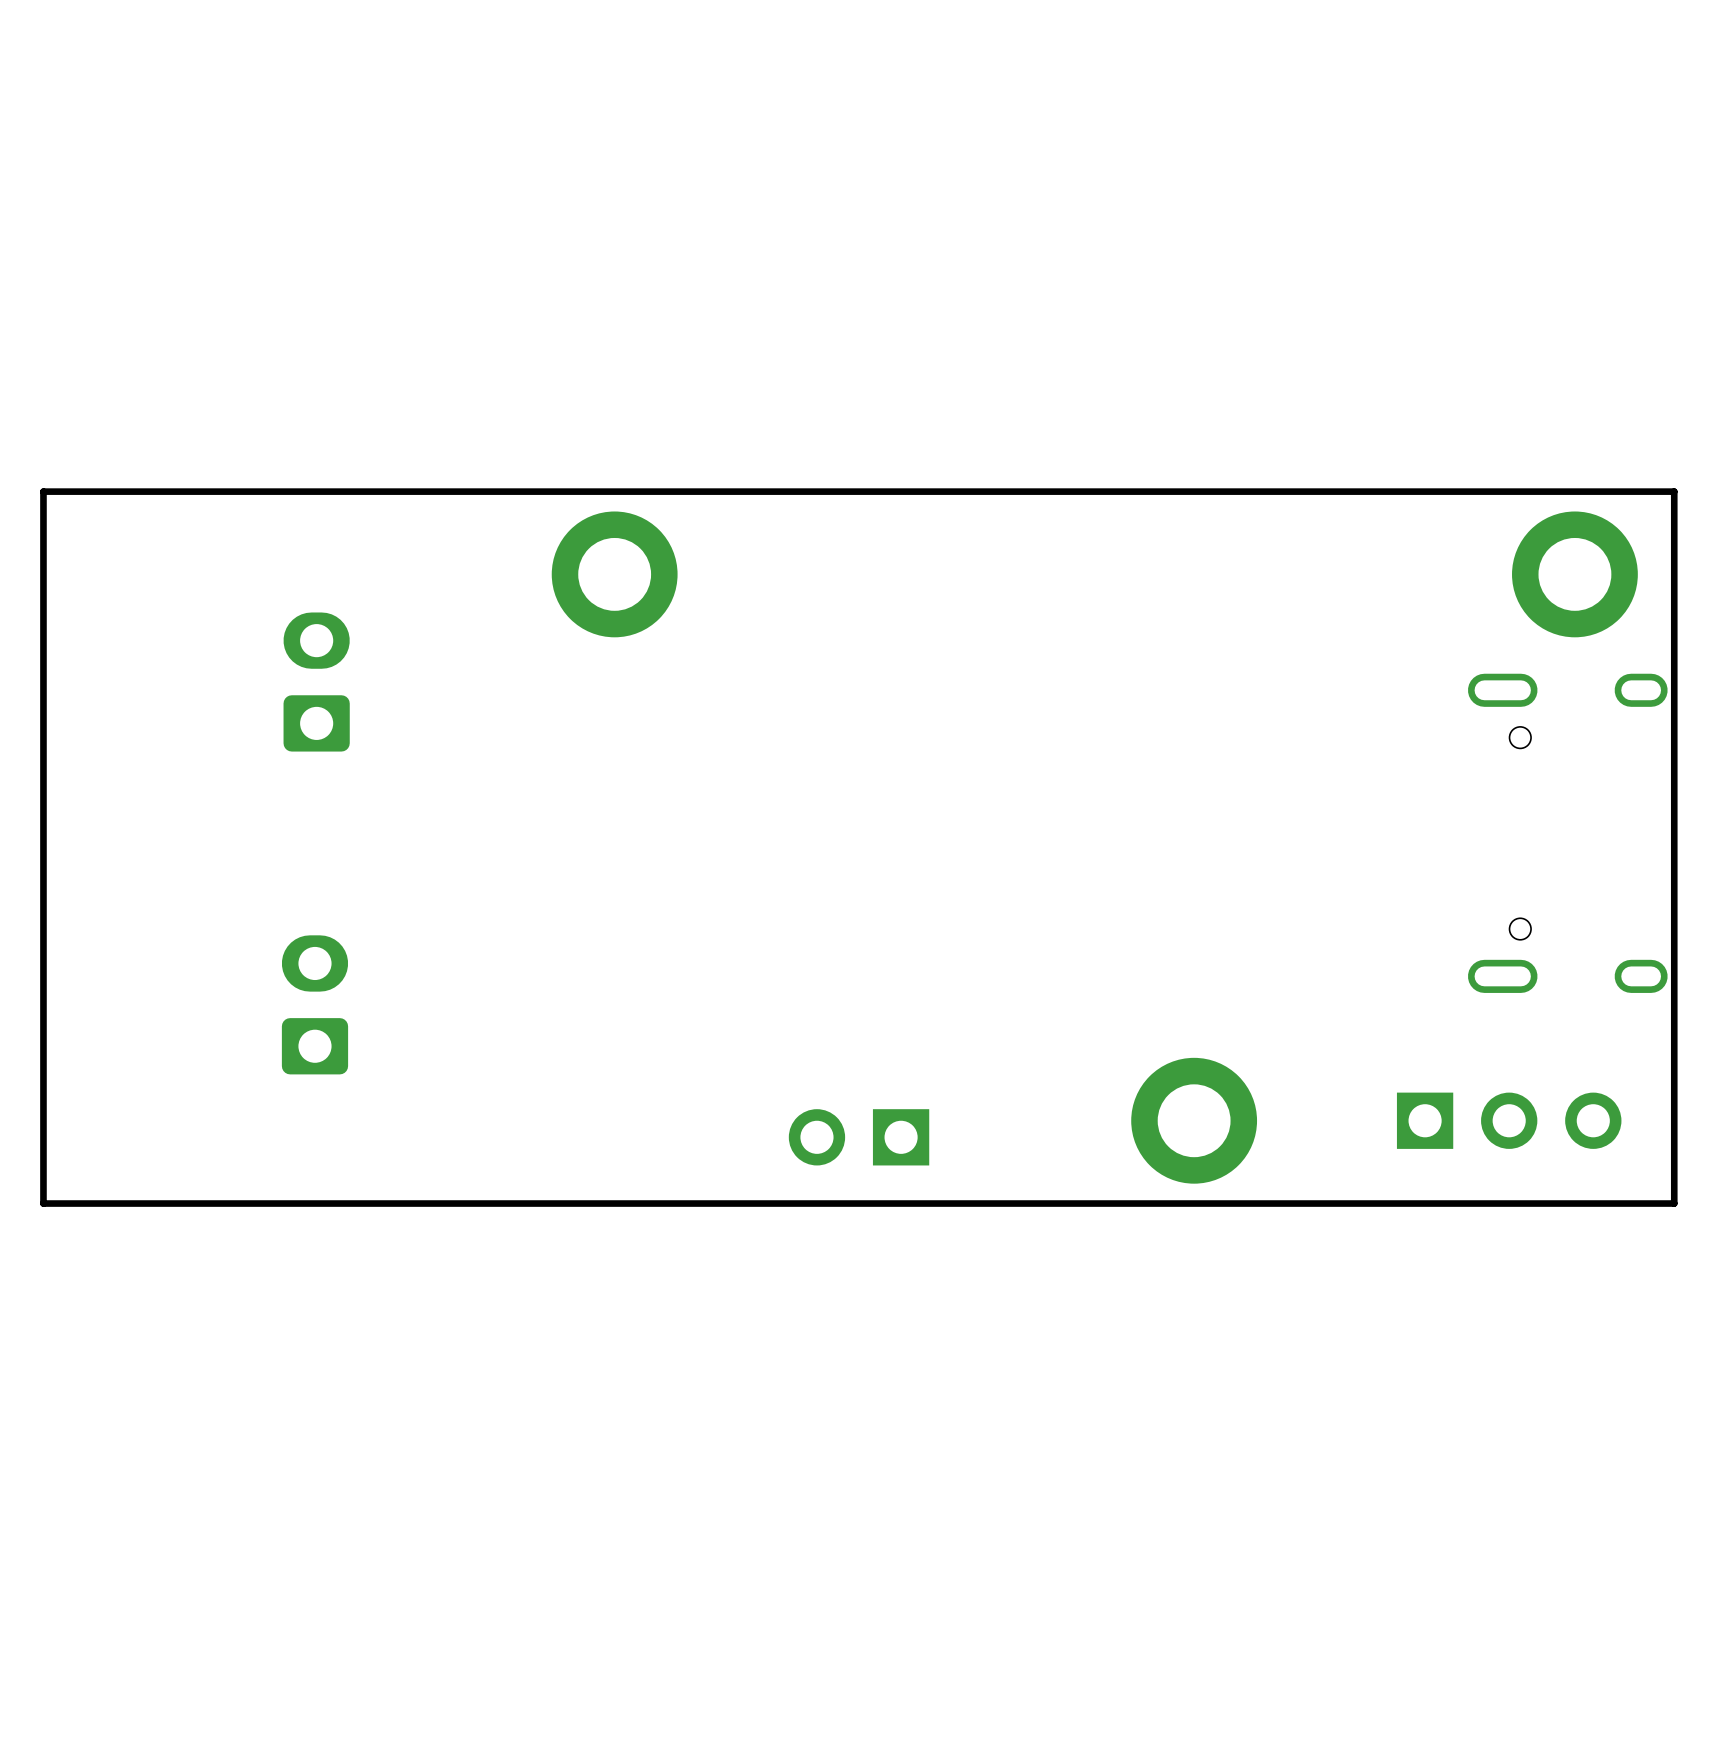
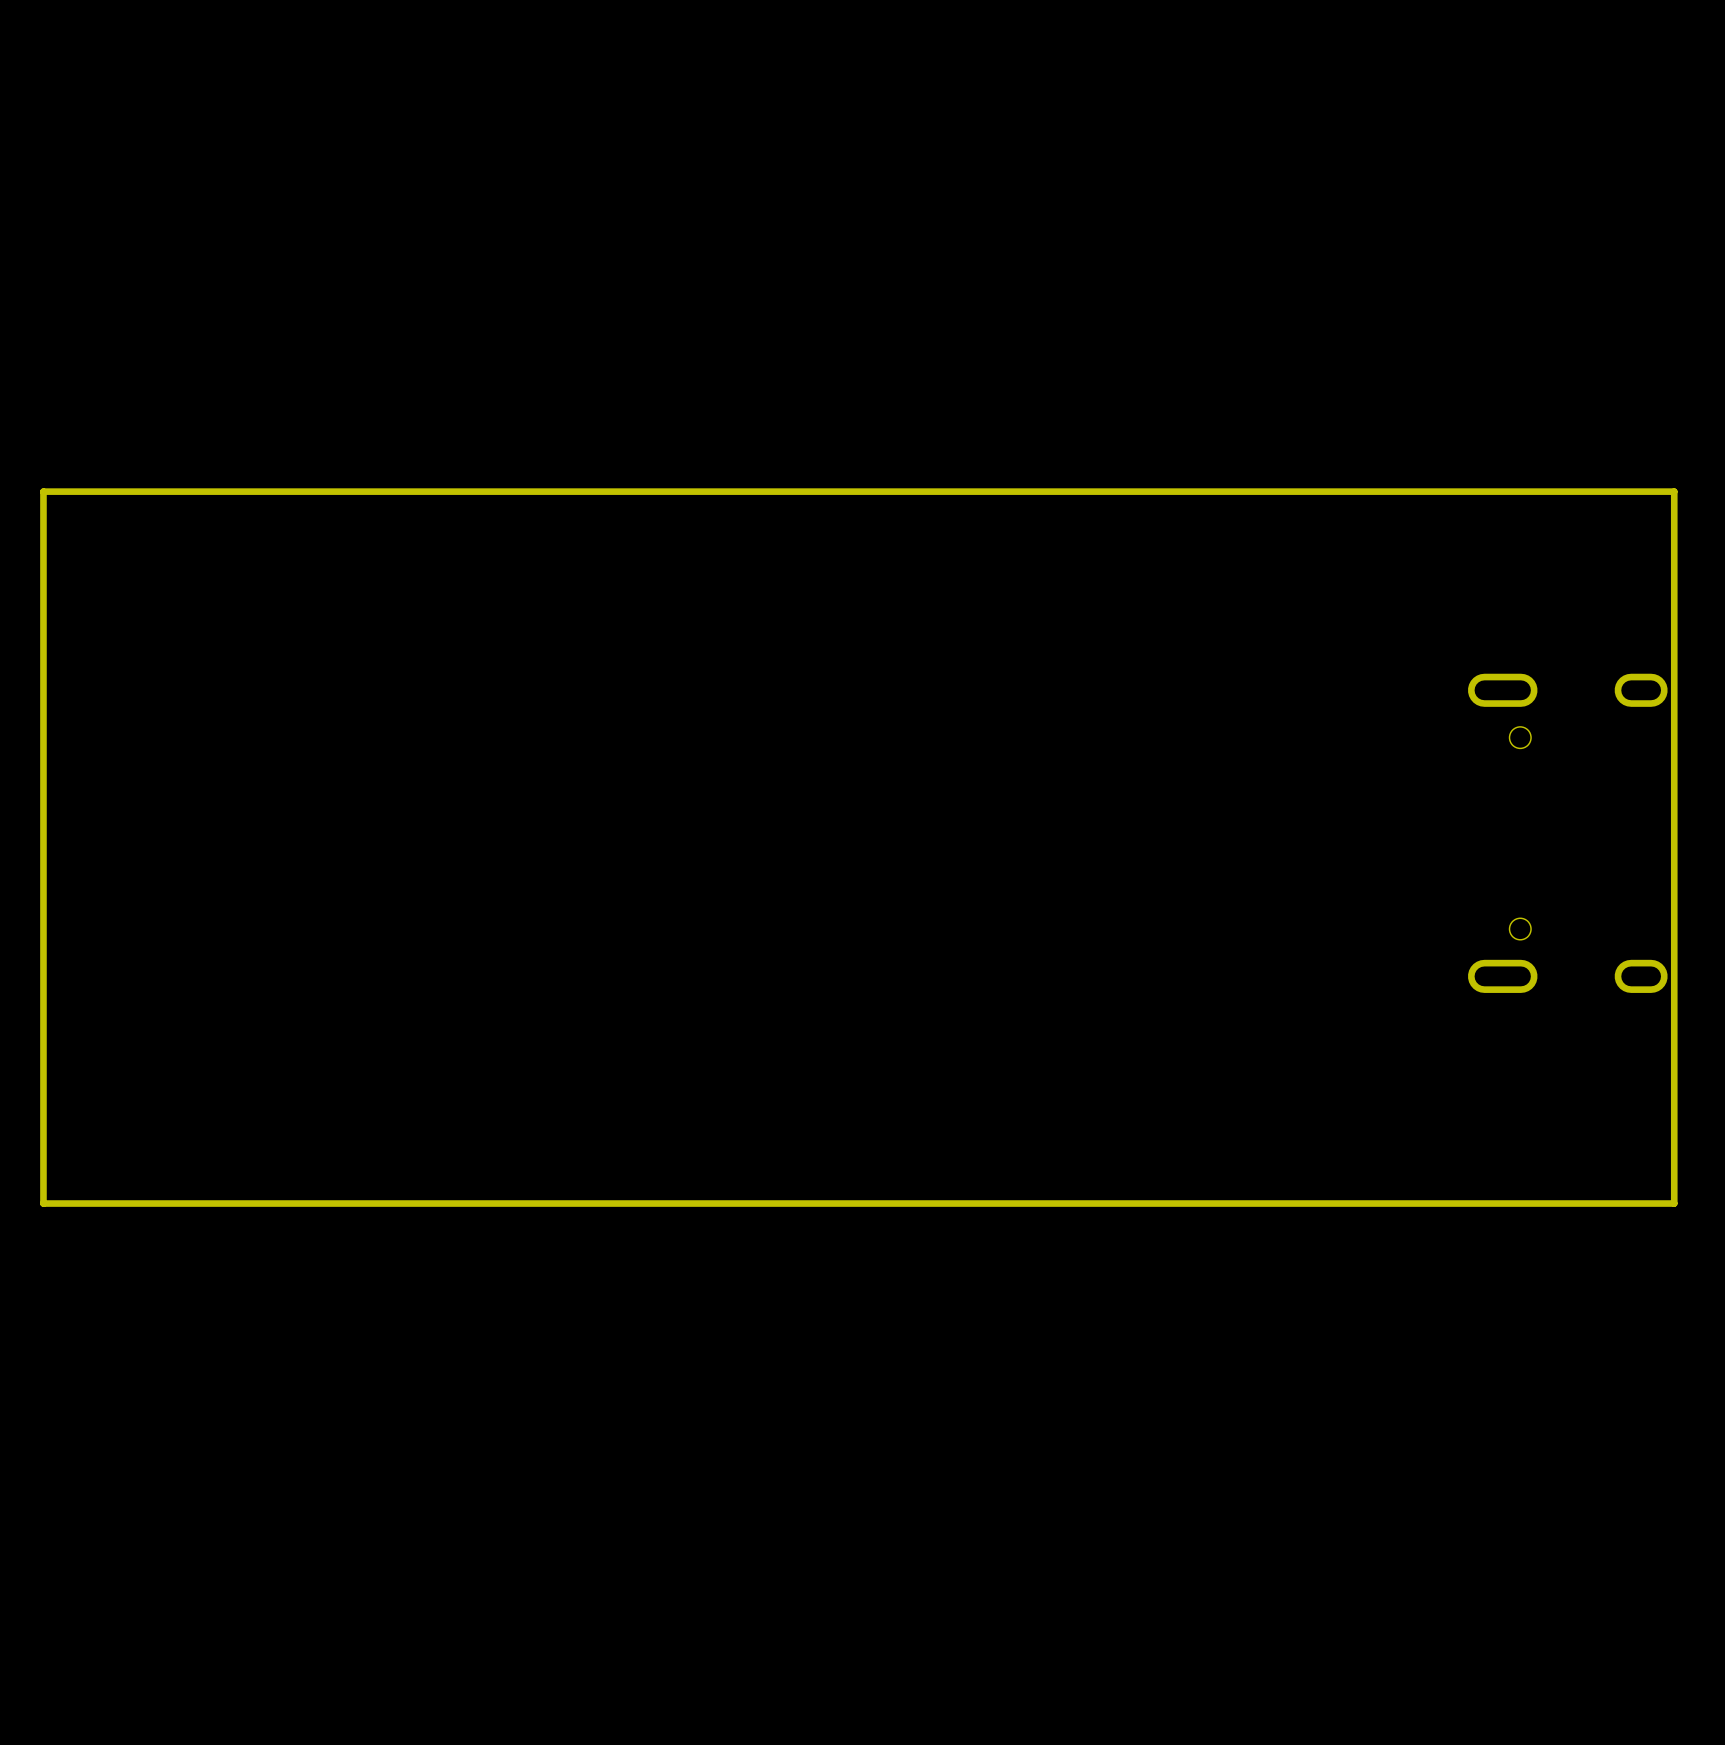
part: (614, 574) -> none
part: (1574, 574) -> none
part: (316, 682) -> none
part: (314, 1004) -> none
part: (1194, 1120) -> none
part: (1509, 1120) -> none
part: (859, 1137) -> none

